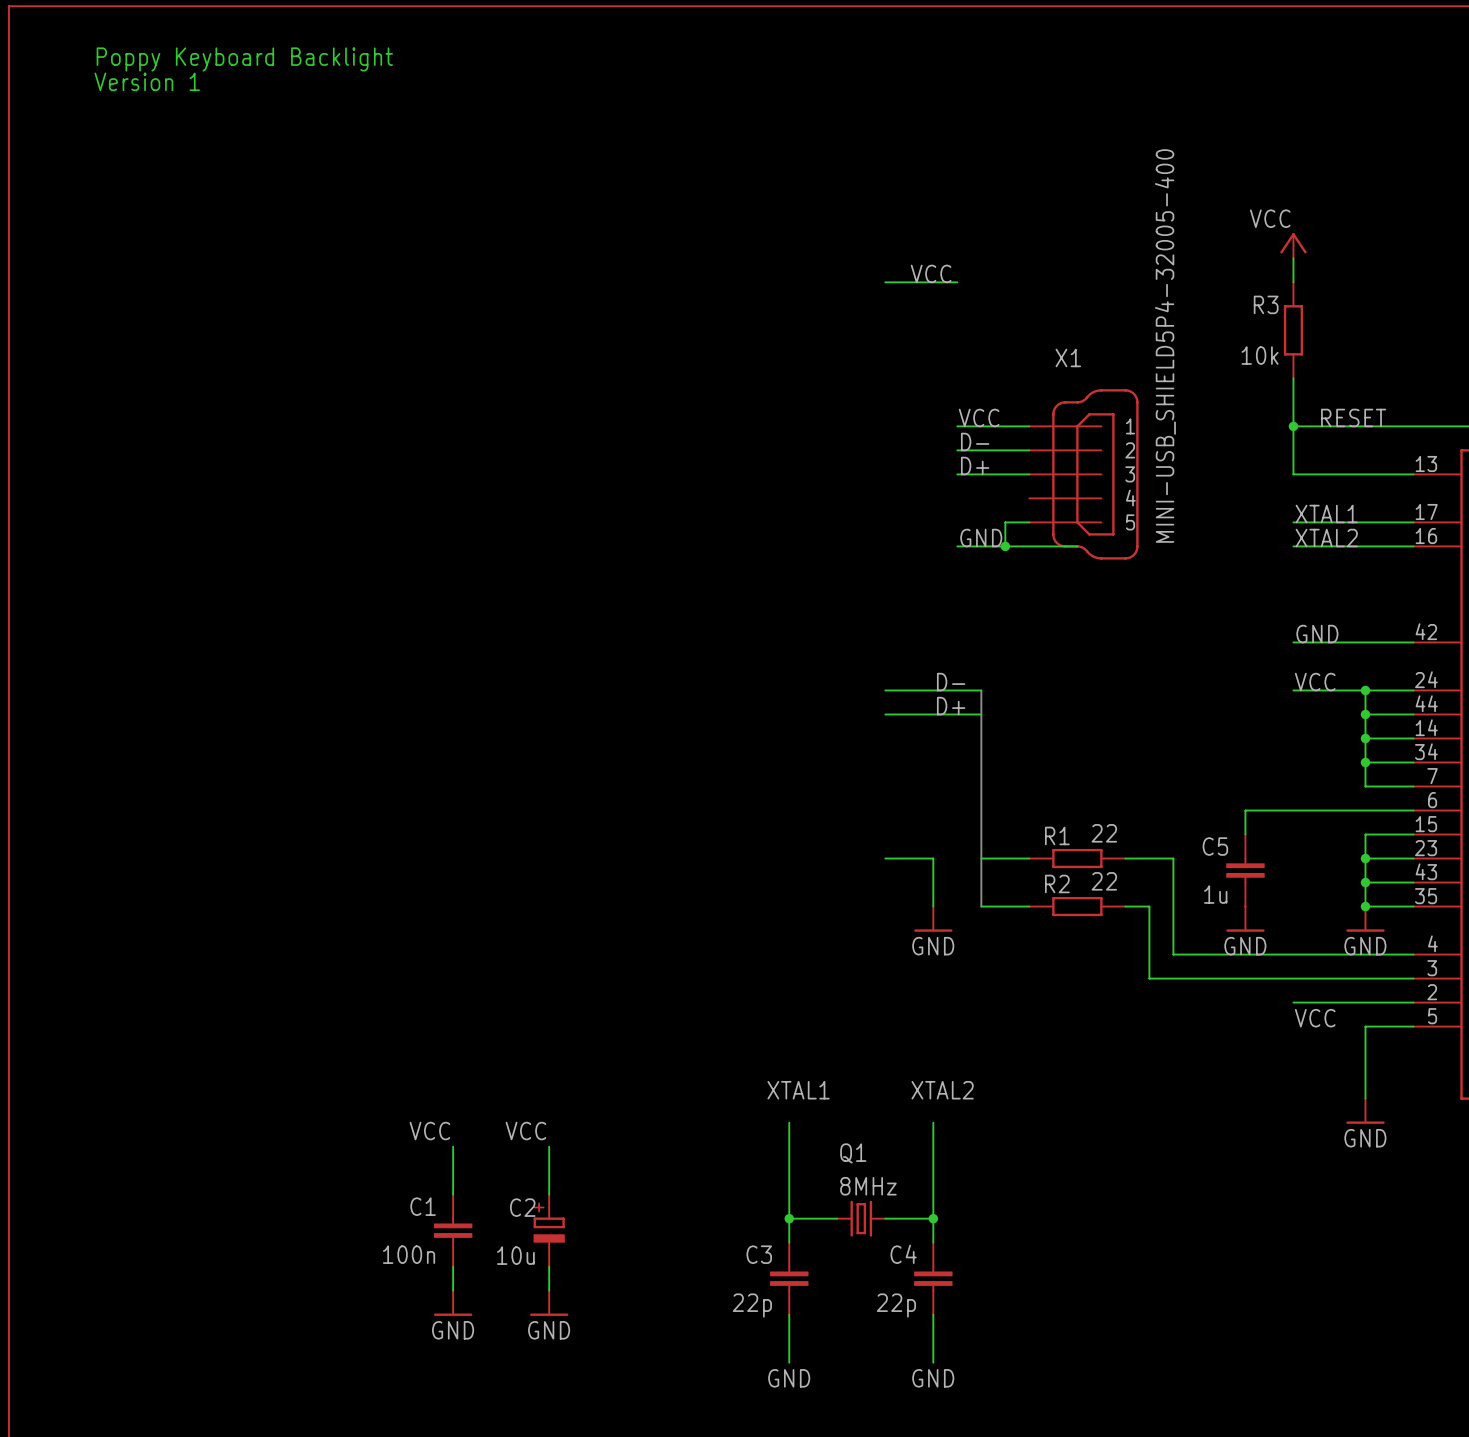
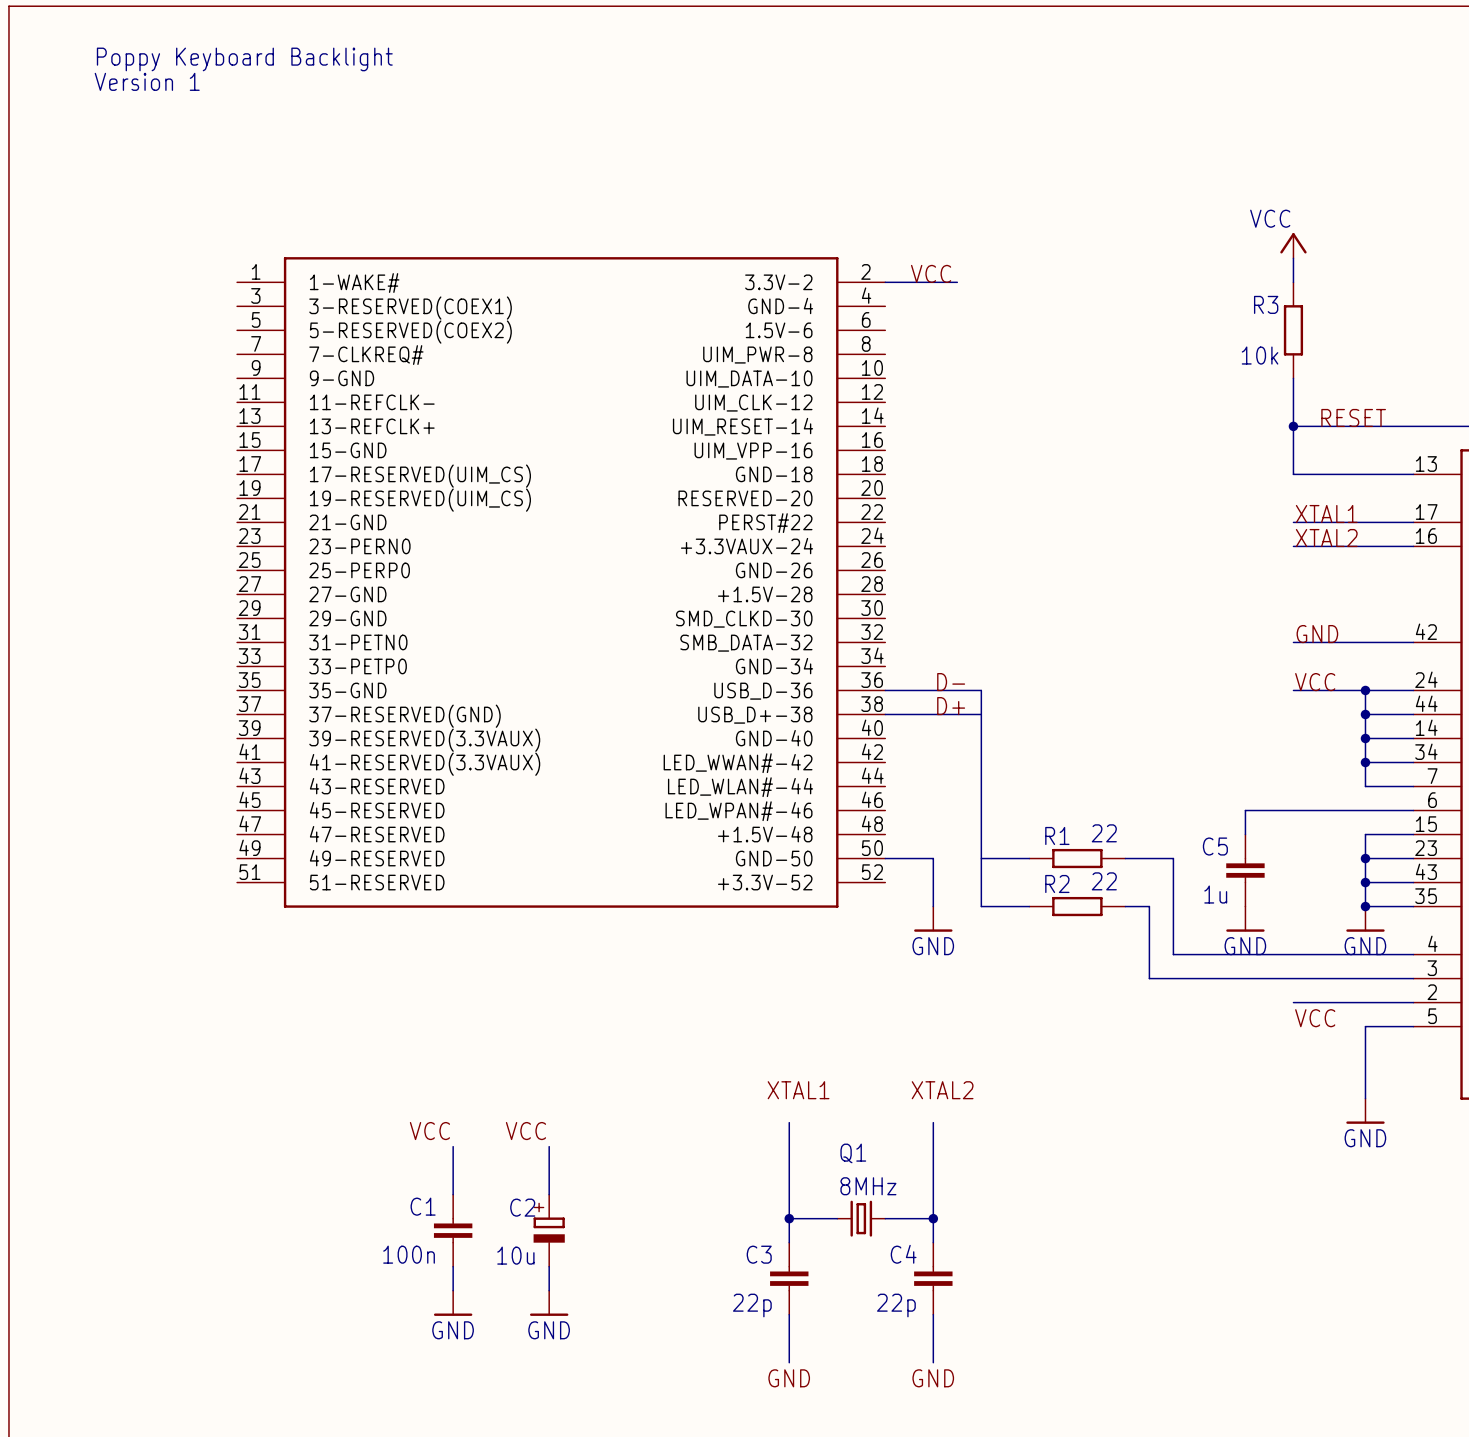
label: VCC (979, 417) -> none
wire: (957, 426) (1029, 426) -> none
label: D- (975, 441) -> none
wire: (957, 450) (1029, 450) -> none
label: D+ (975, 465) -> none
wire: (957, 474) (1029, 474) -> none
X1: MINI-USB_SHIELD5P4-32005-400 (1083, 474) -> none
wire: (1029, 522) (1005, 522) (1005, 546) -> none
label: GND (981, 538) -> none
wire: (957, 546) (1077, 546) -> none
junction: (1005, 546) -> none
part: none -> (561, 582)

